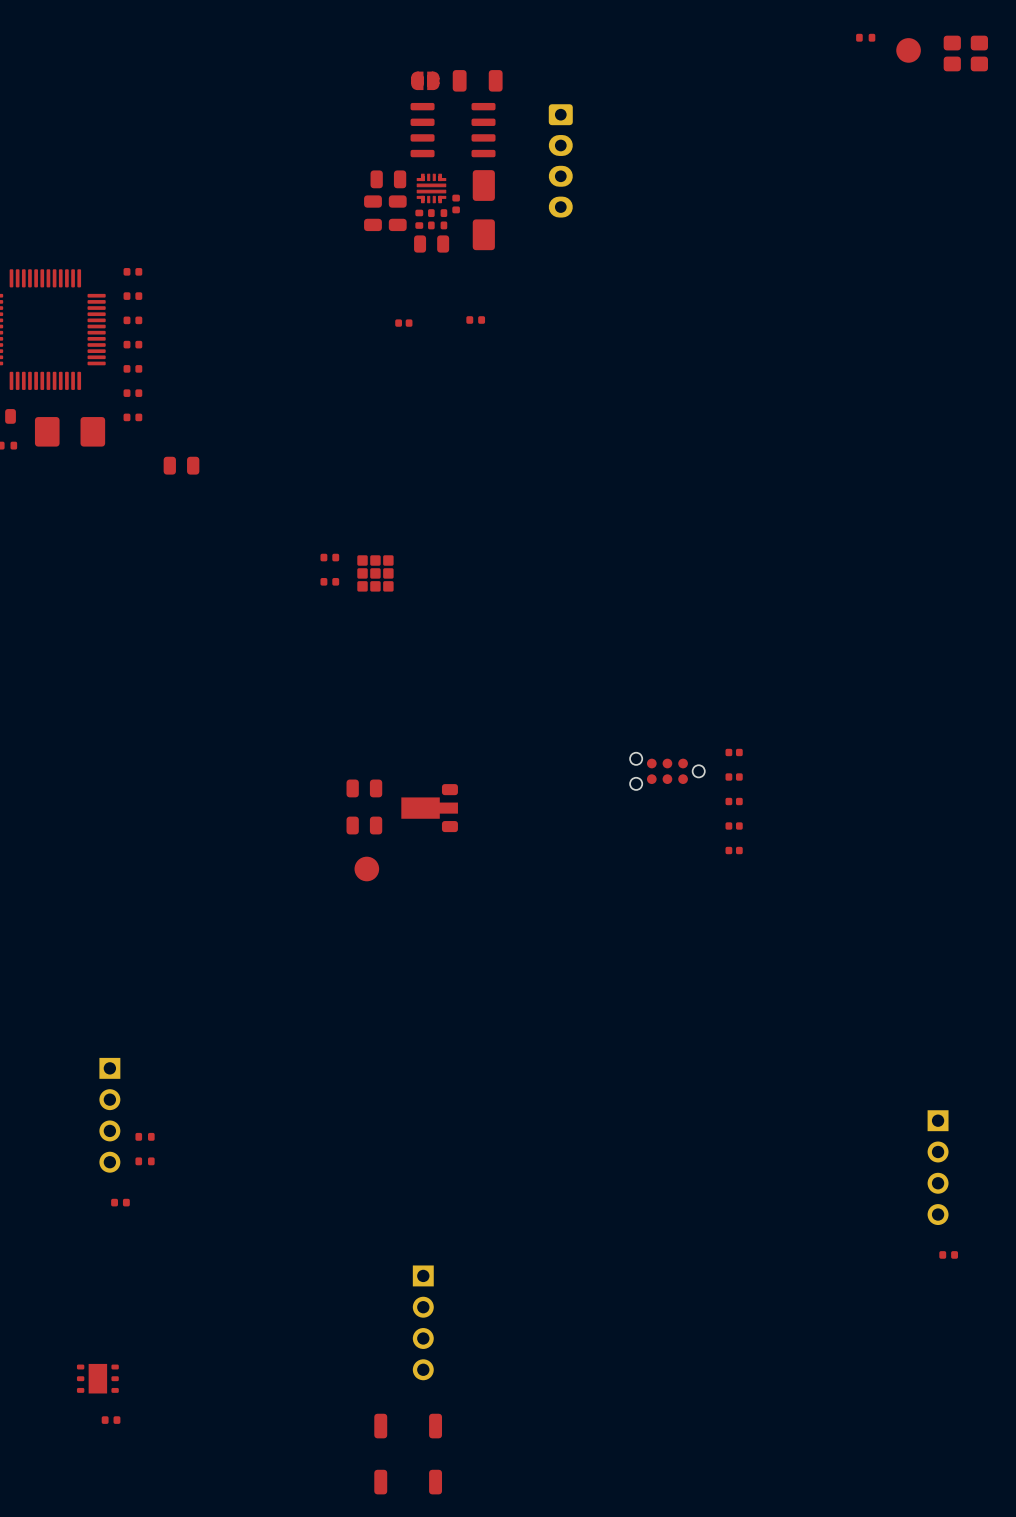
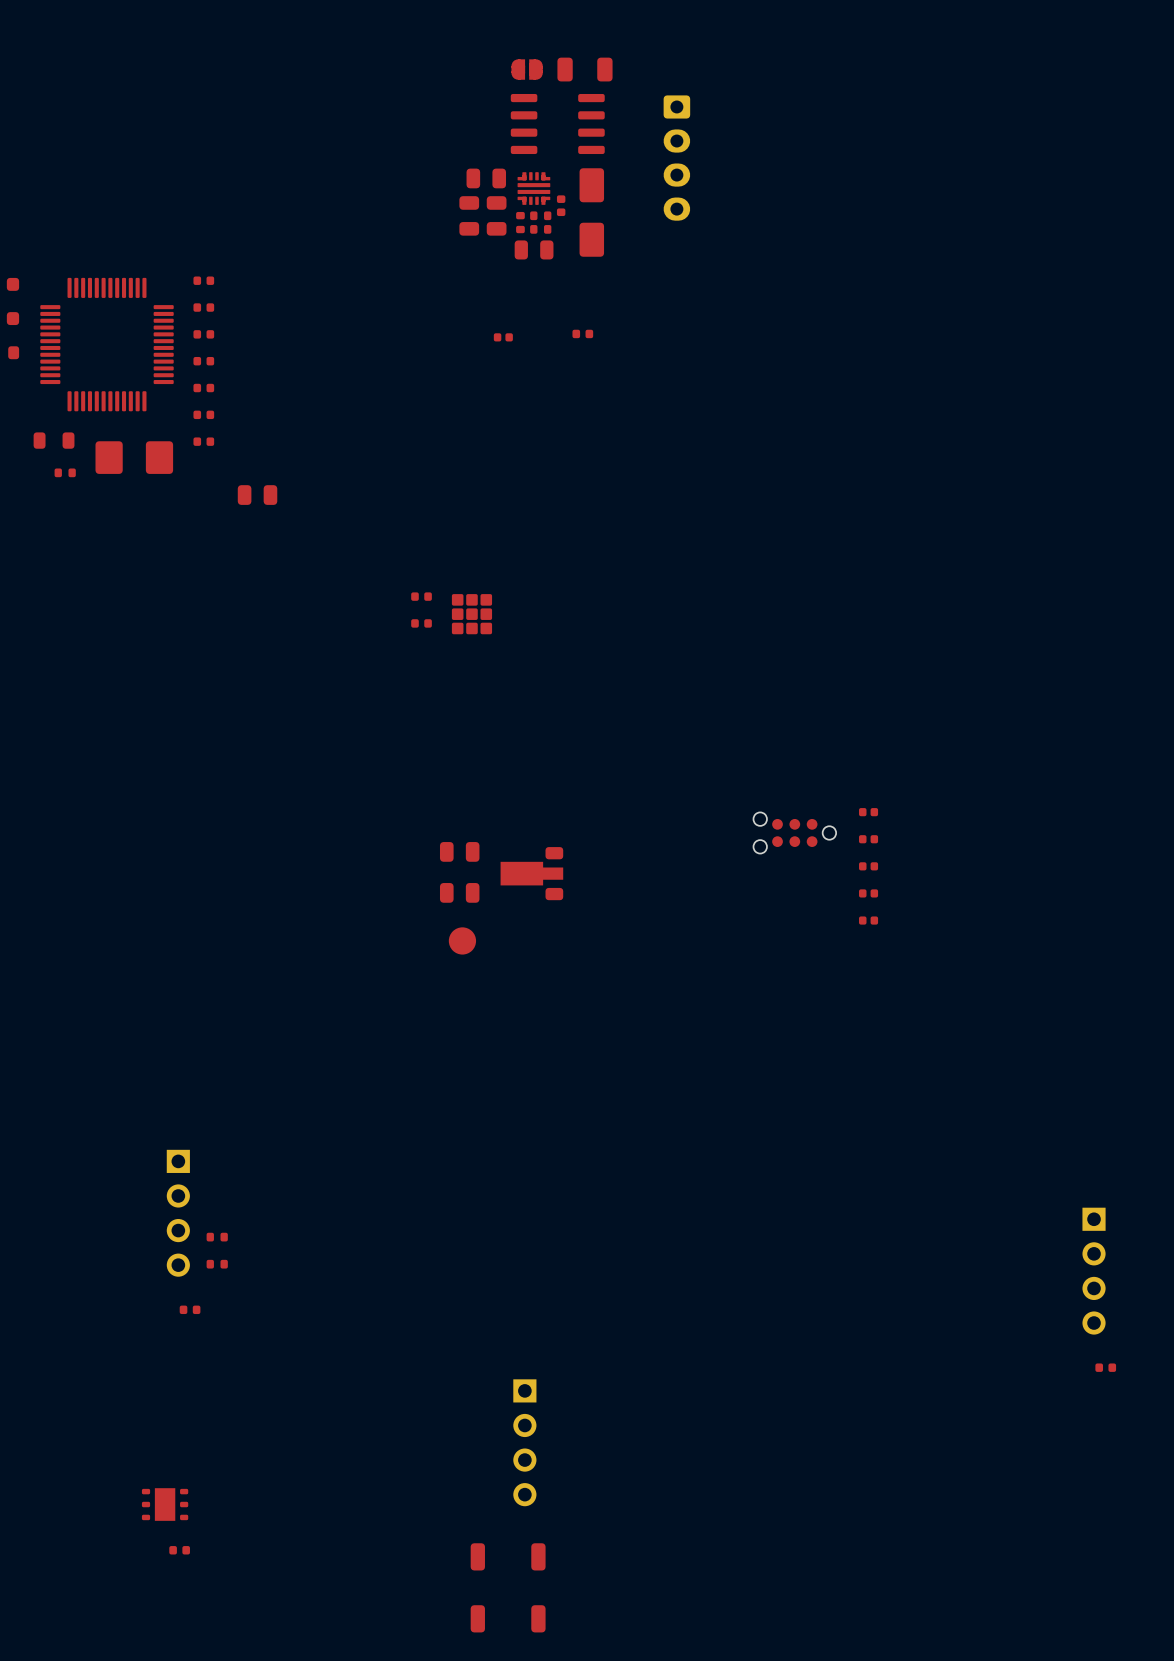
part: (865, 37) -> none
part: (908, 50) -> none
part: (965, 53) -> none

